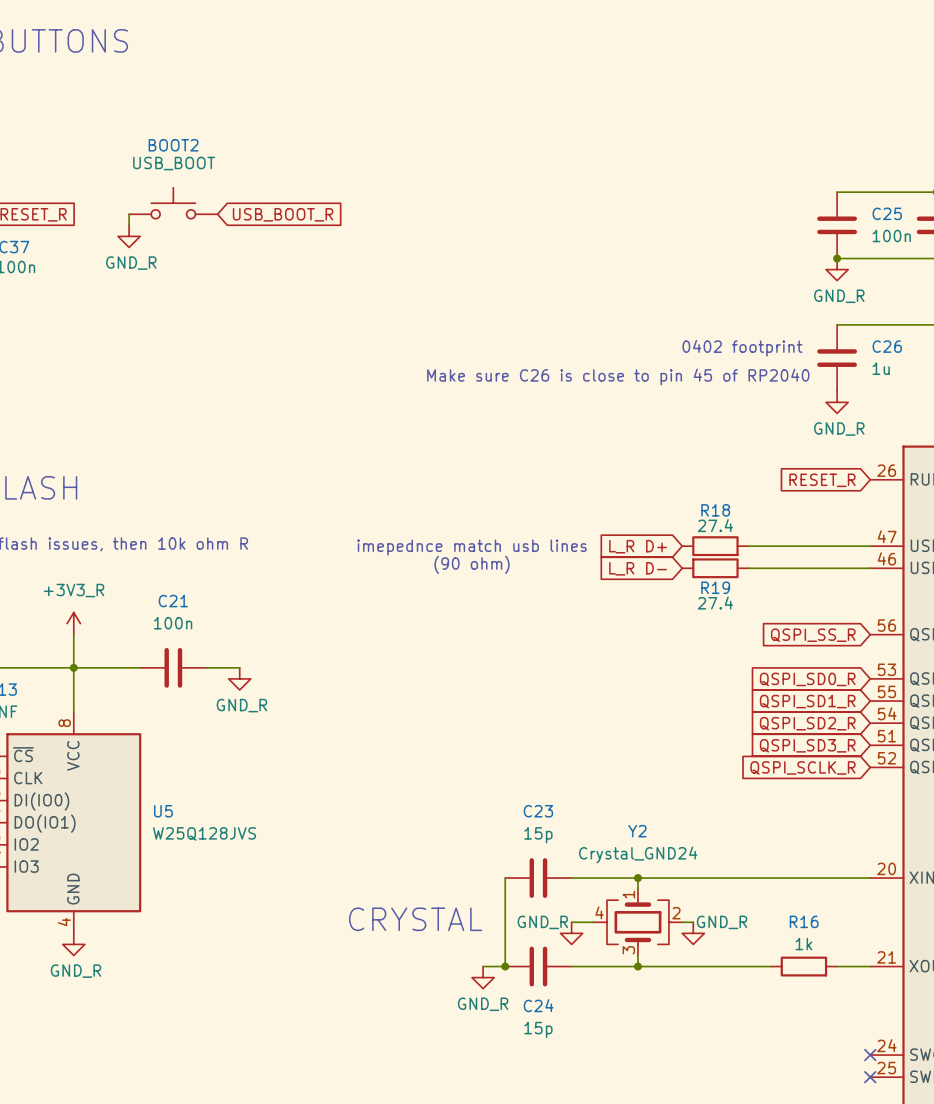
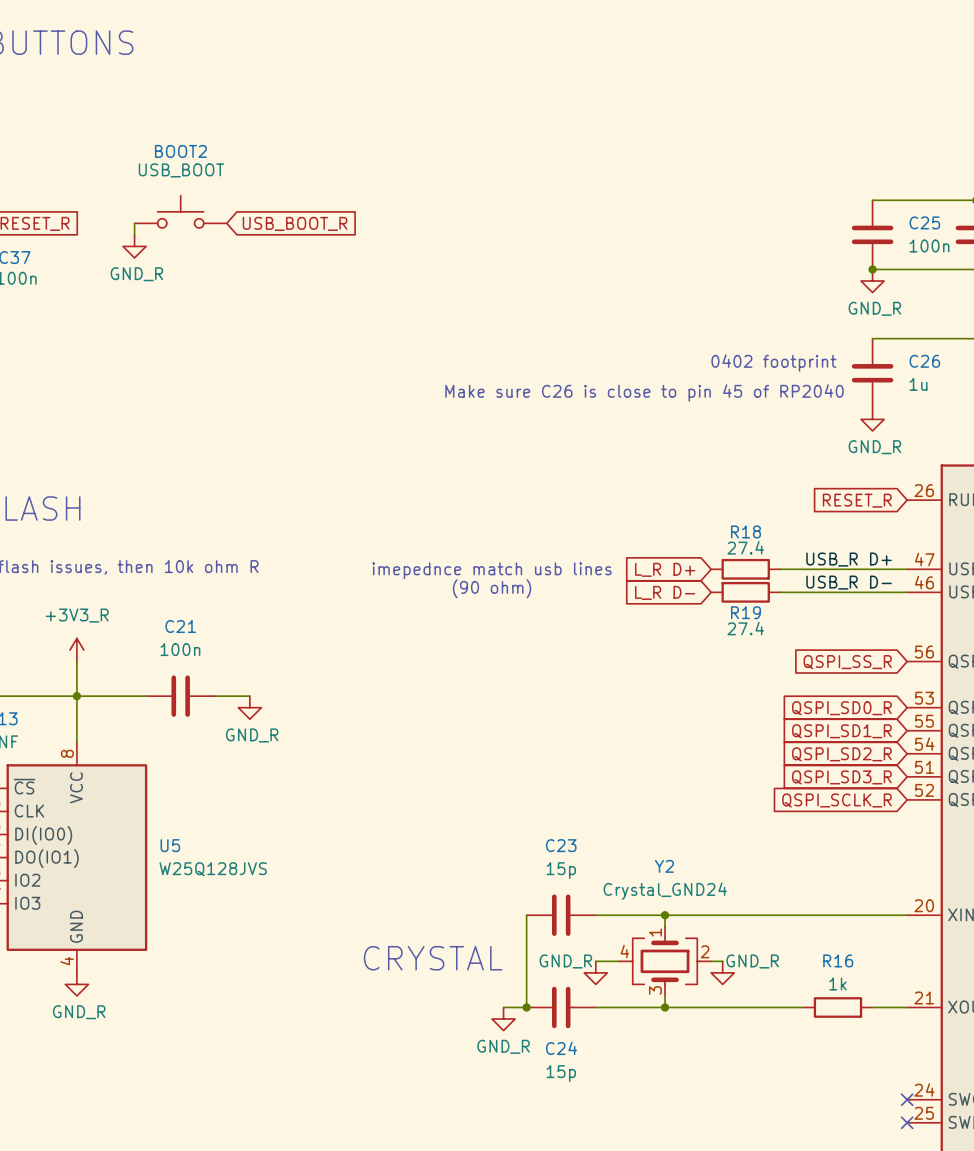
label: none -> USB_R D+ (849, 559)
label: none -> USB_R D- (849, 582)

